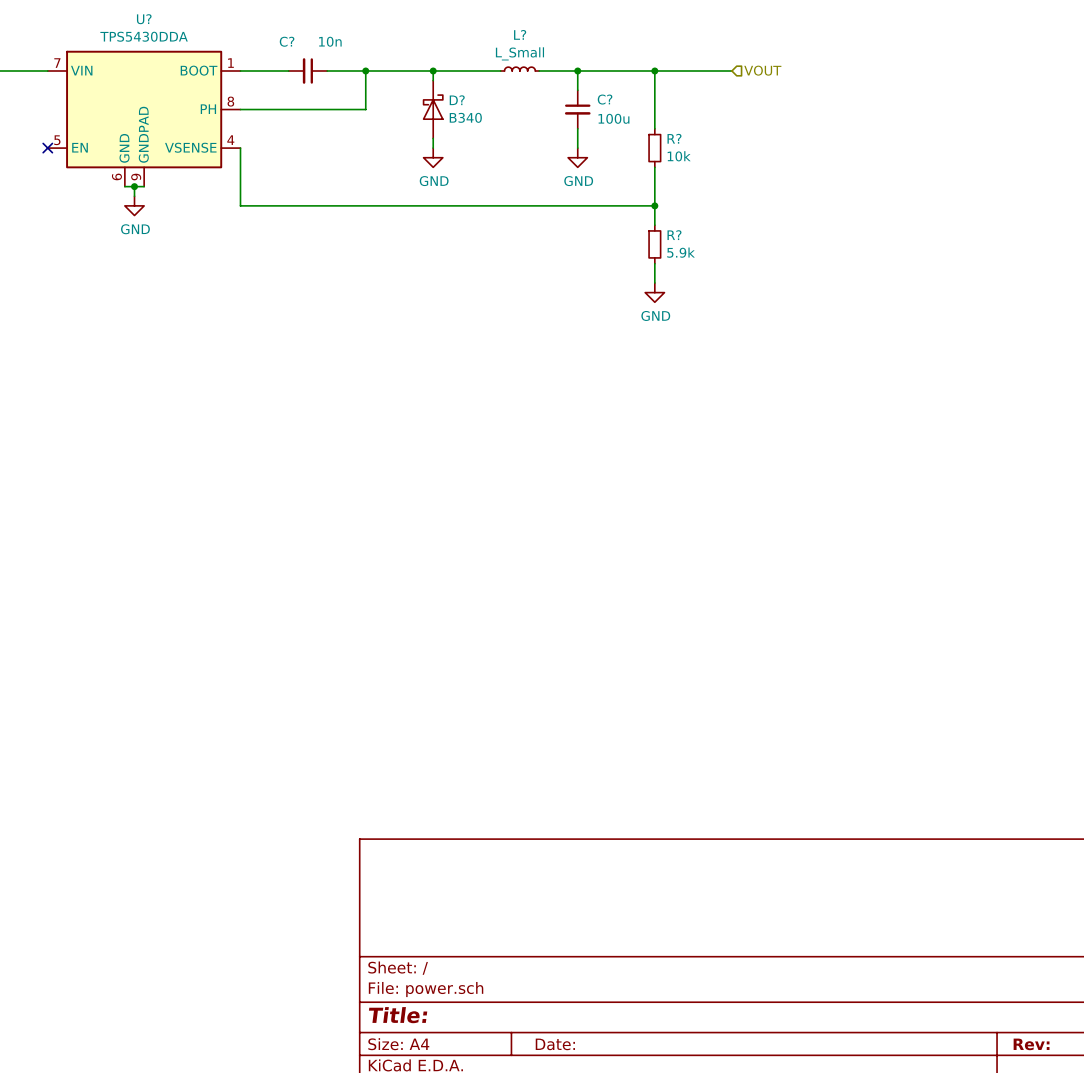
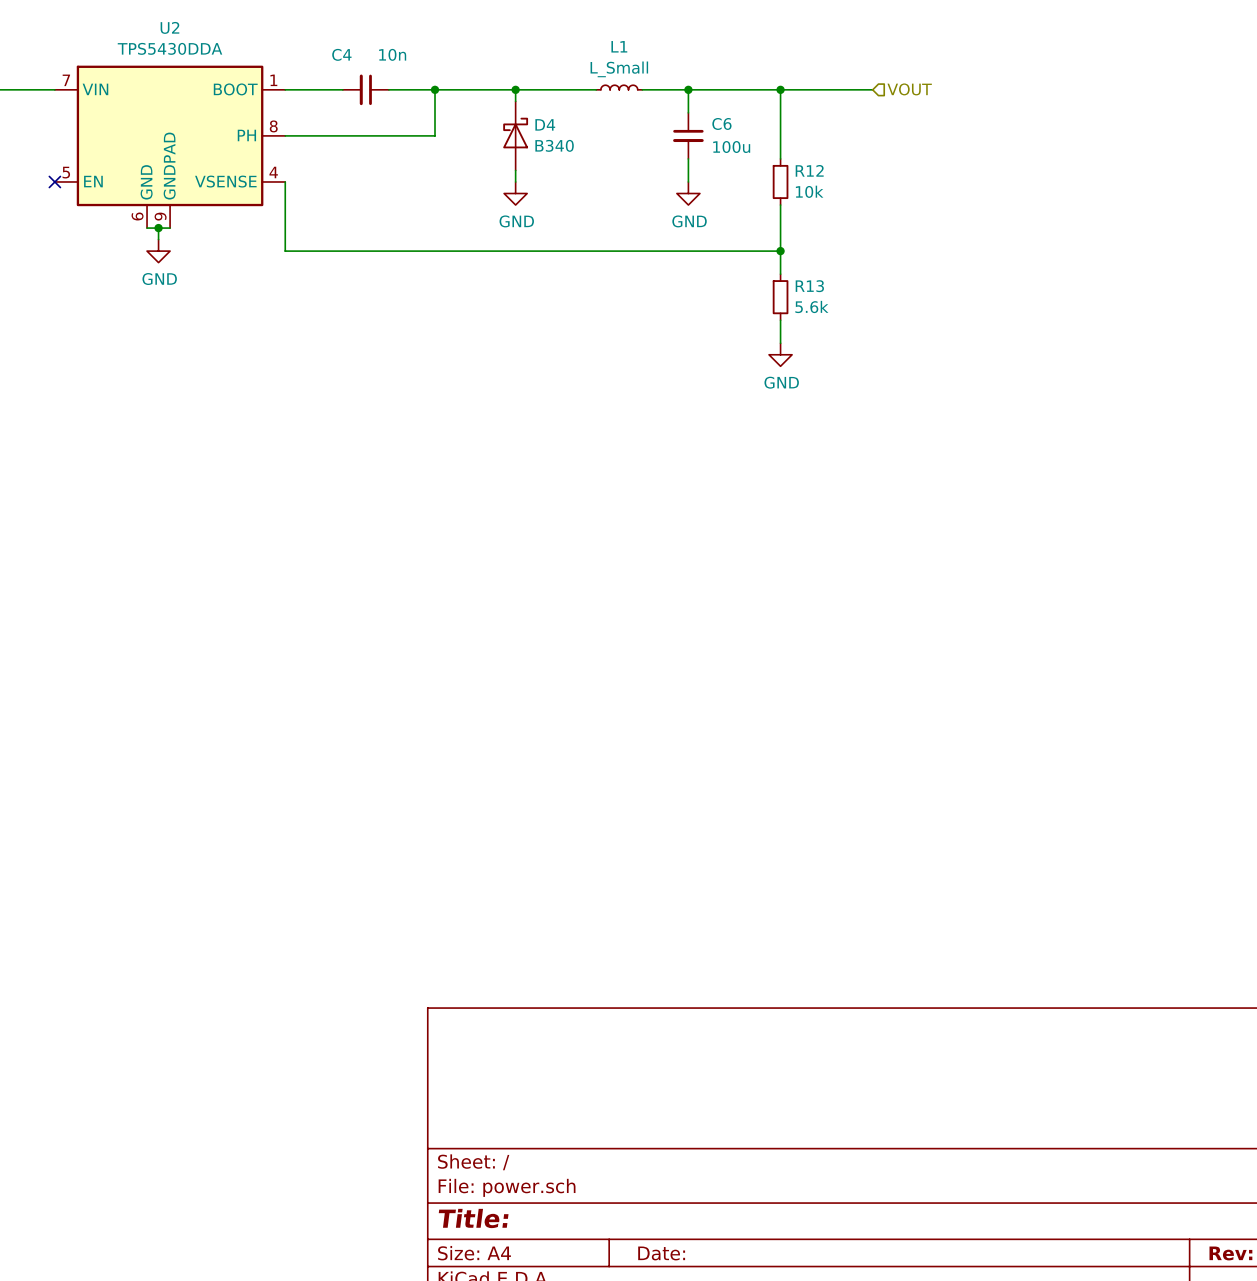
U? name: U? (144, 19) -> U2 (169, 27)
L? name: L? (520, 34) -> L1 (619, 46)
C? name: C? (287, 41) -> C4 (341, 54)
C? name: C? (605, 99) -> C6 (721, 123)
D? name: D? (457, 100) -> D4 (545, 124)
R? name: R? (674, 138) -> R12 (809, 170)
R? name: R? (674, 235) -> R13 (809, 286)
R? value: 5.9k (681, 252) -> 5.6k (811, 306)

